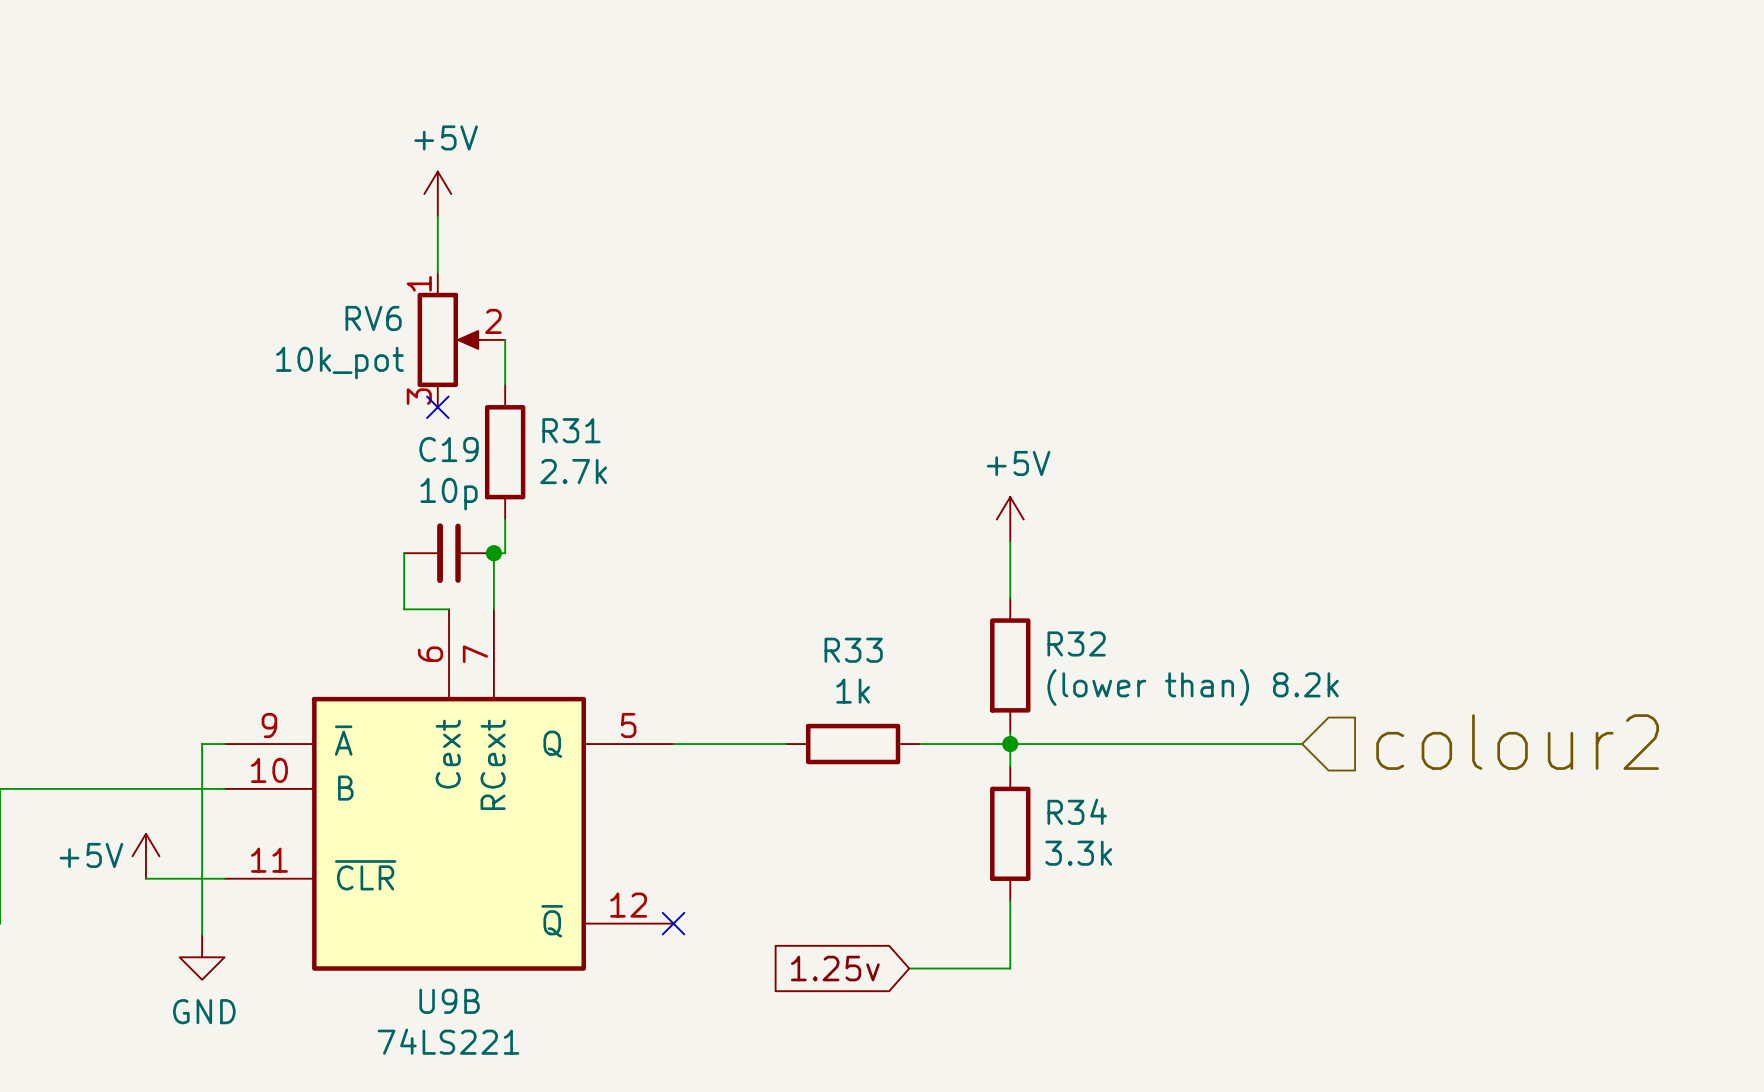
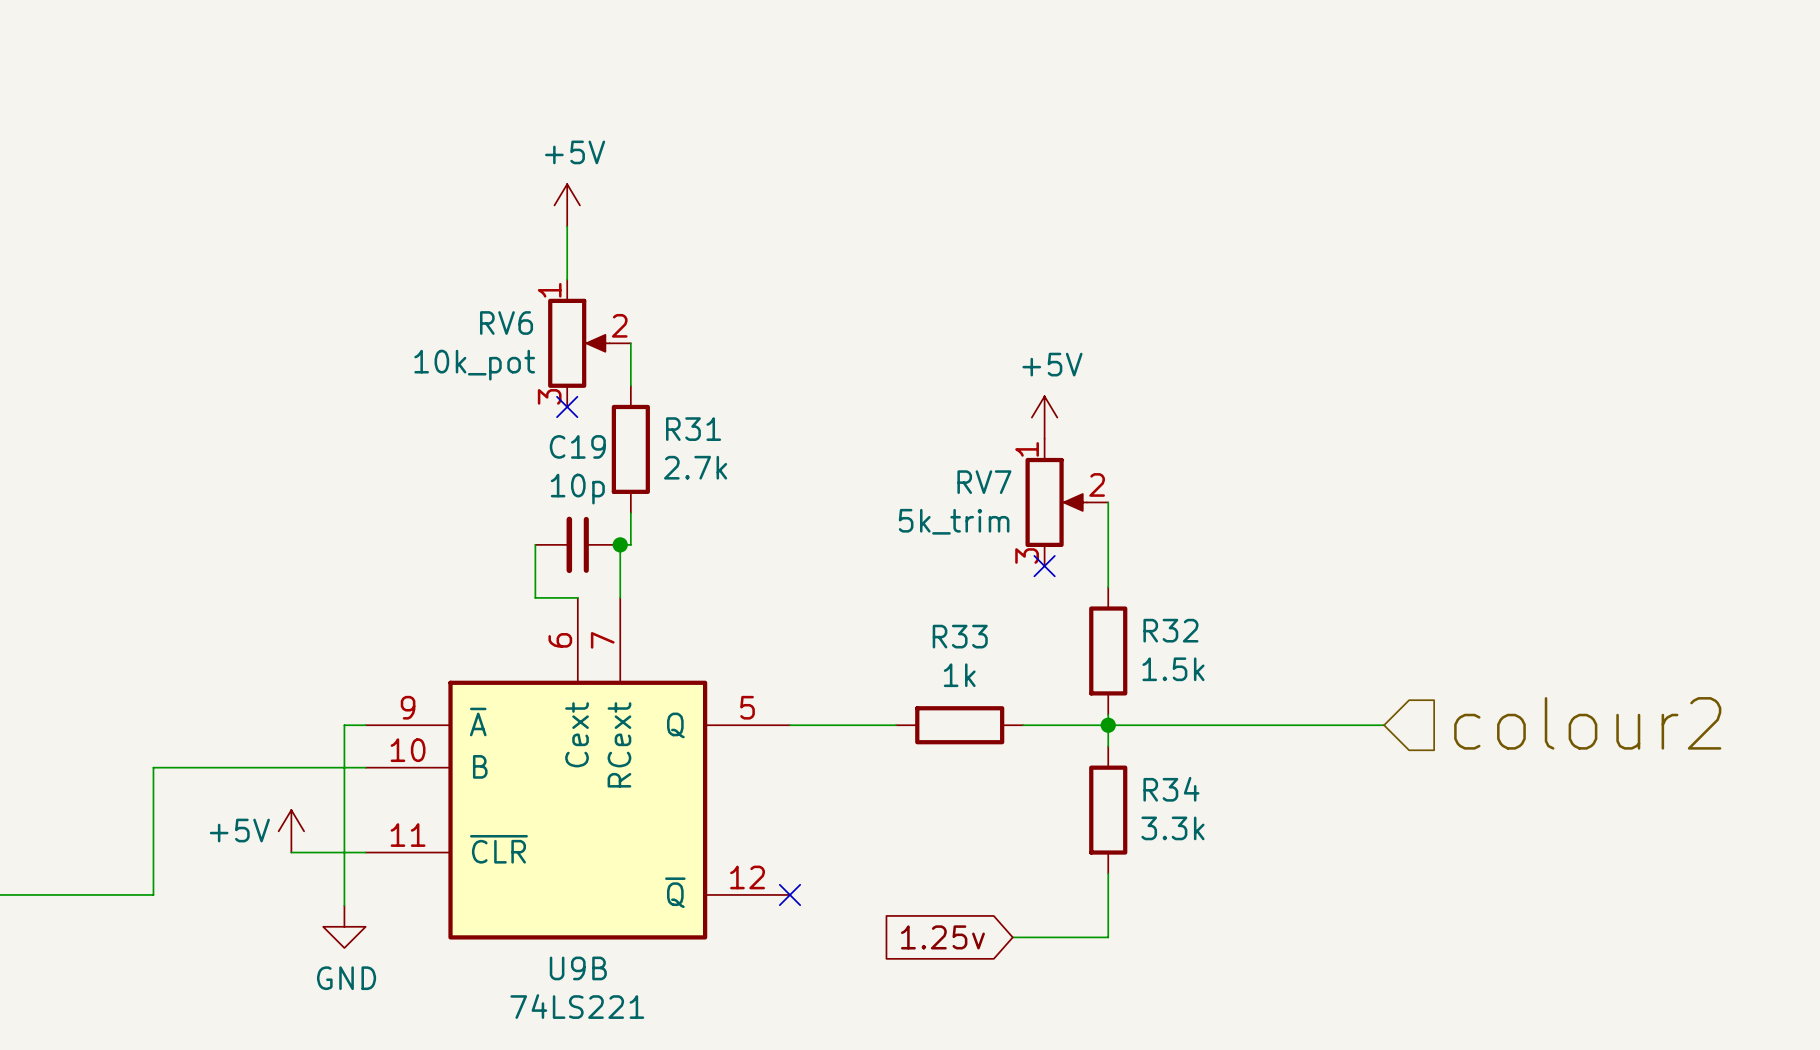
RV7: none -> 5k_trim (1066, 502)
power symbol position: +5V (1010, 519) -> +5V (1044, 417)
no-connect mark: none -> (1044, 566)
R32 value: (lower than) 8.2k (1193, 687) -> 1.5k (1173, 669)

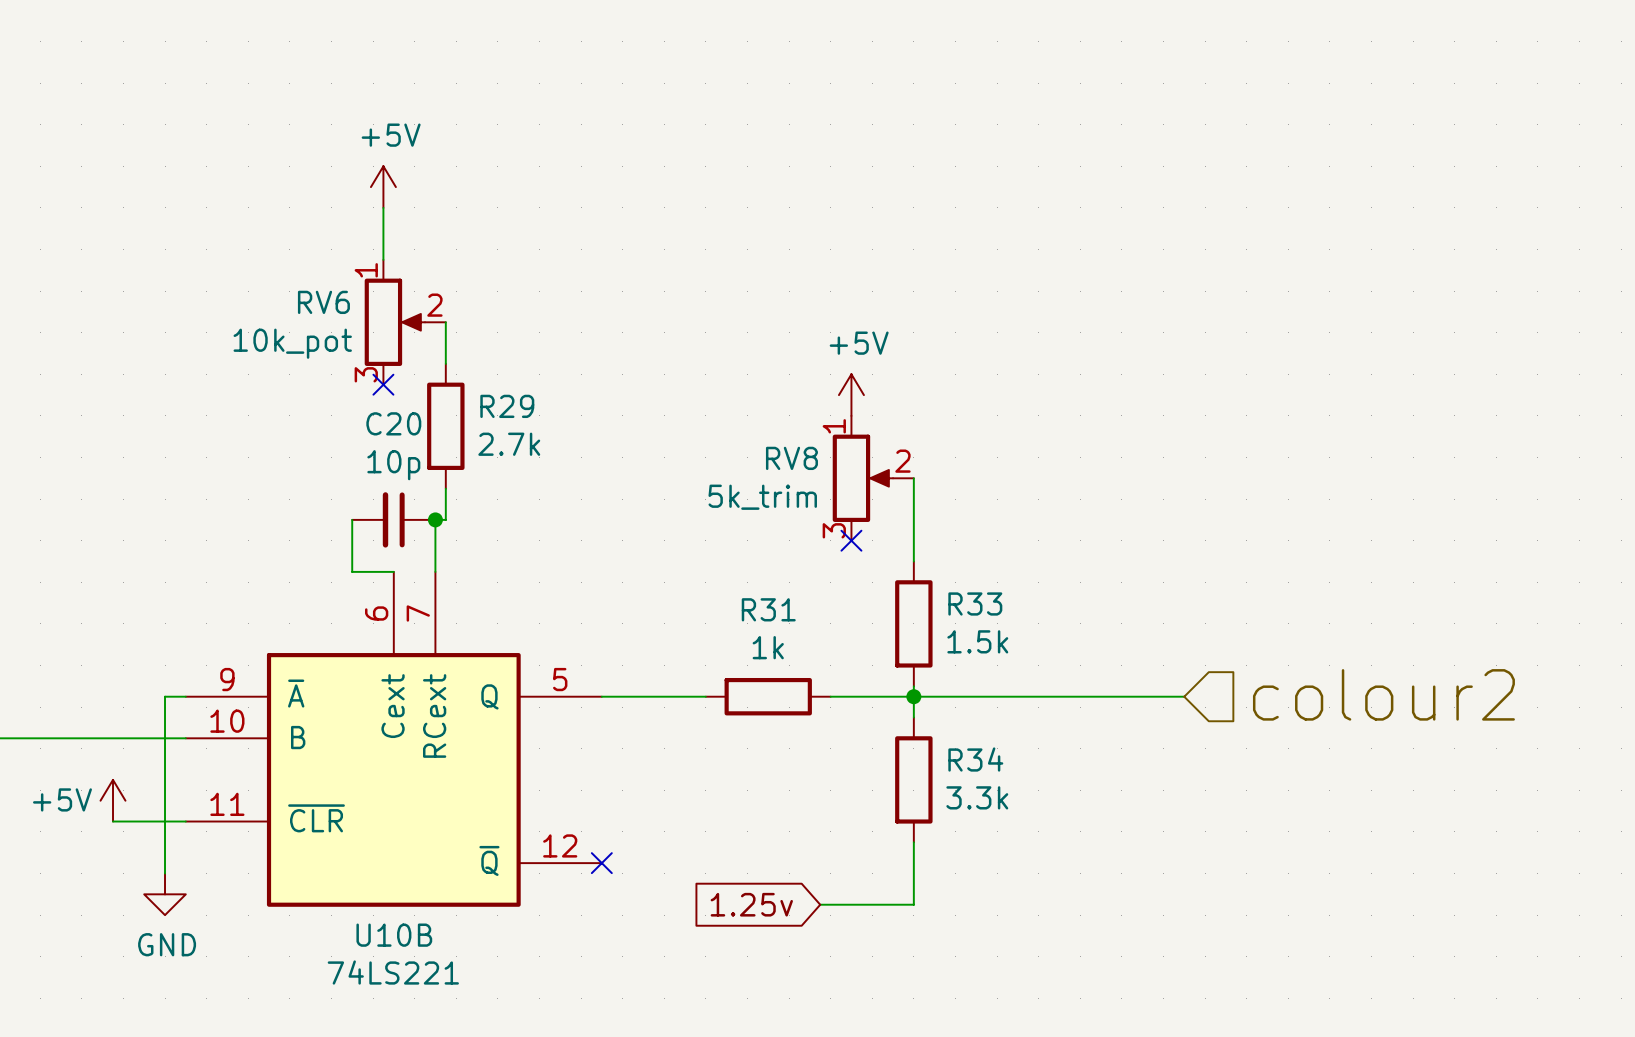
R31 name: R31 (693, 429) -> R29 (507, 406)
C19 name: C19 (577, 446) -> C20 (393, 423)
RV7 name: RV7 (984, 482) -> RV8 (791, 458)
R32 name: R32 (1170, 630) -> R33 (975, 603)
R33 name: R33 (960, 636) -> R31 (768, 609)
U9B name: U9B (578, 968) -> U10B (394, 935)

